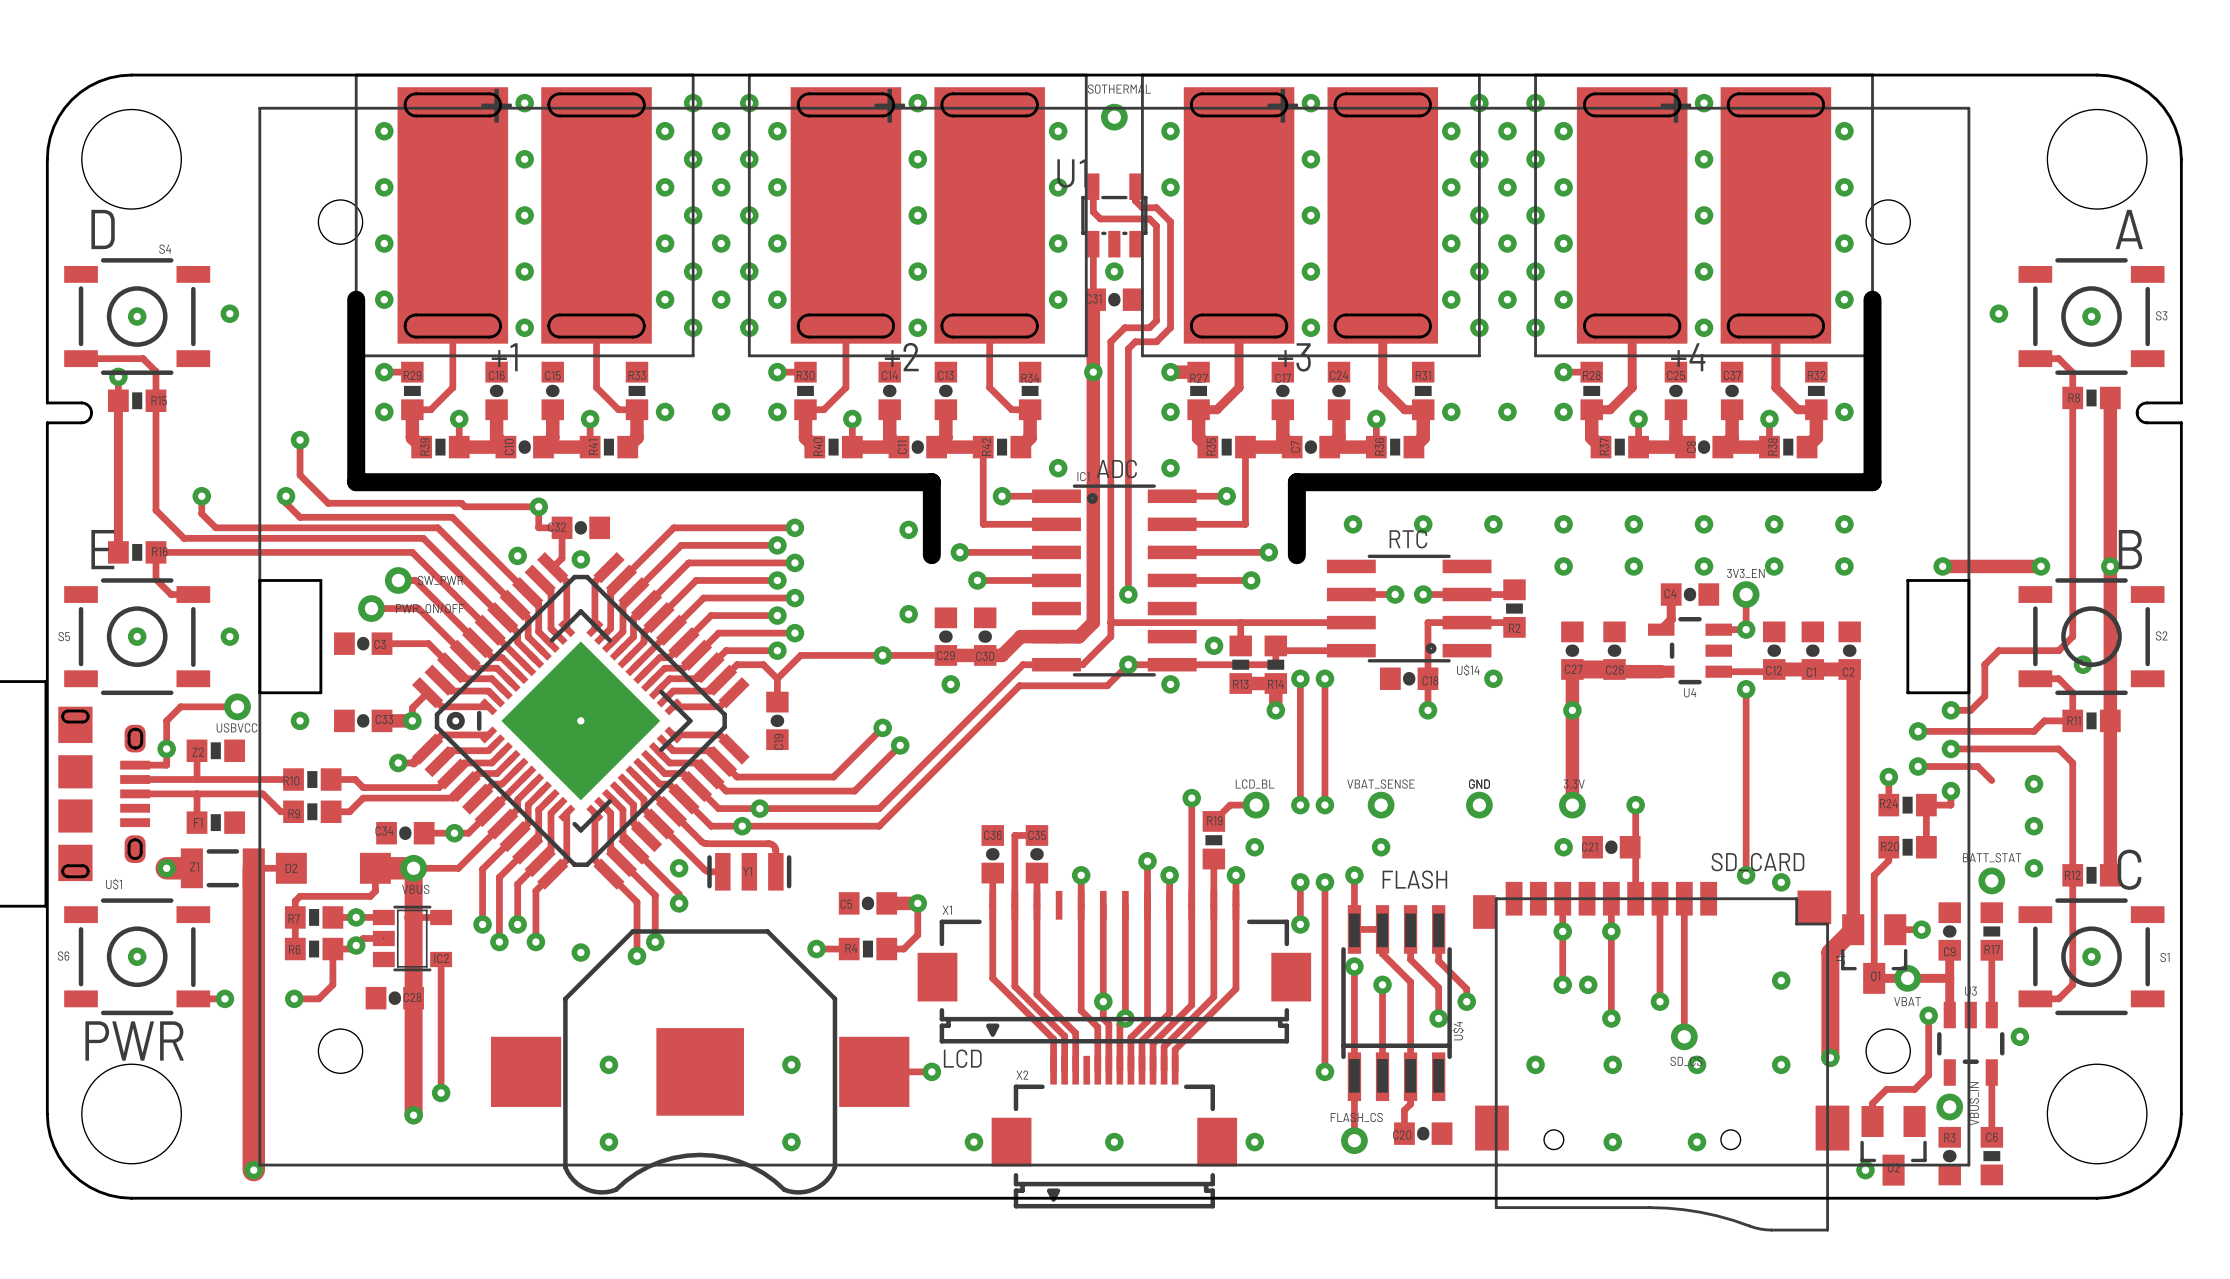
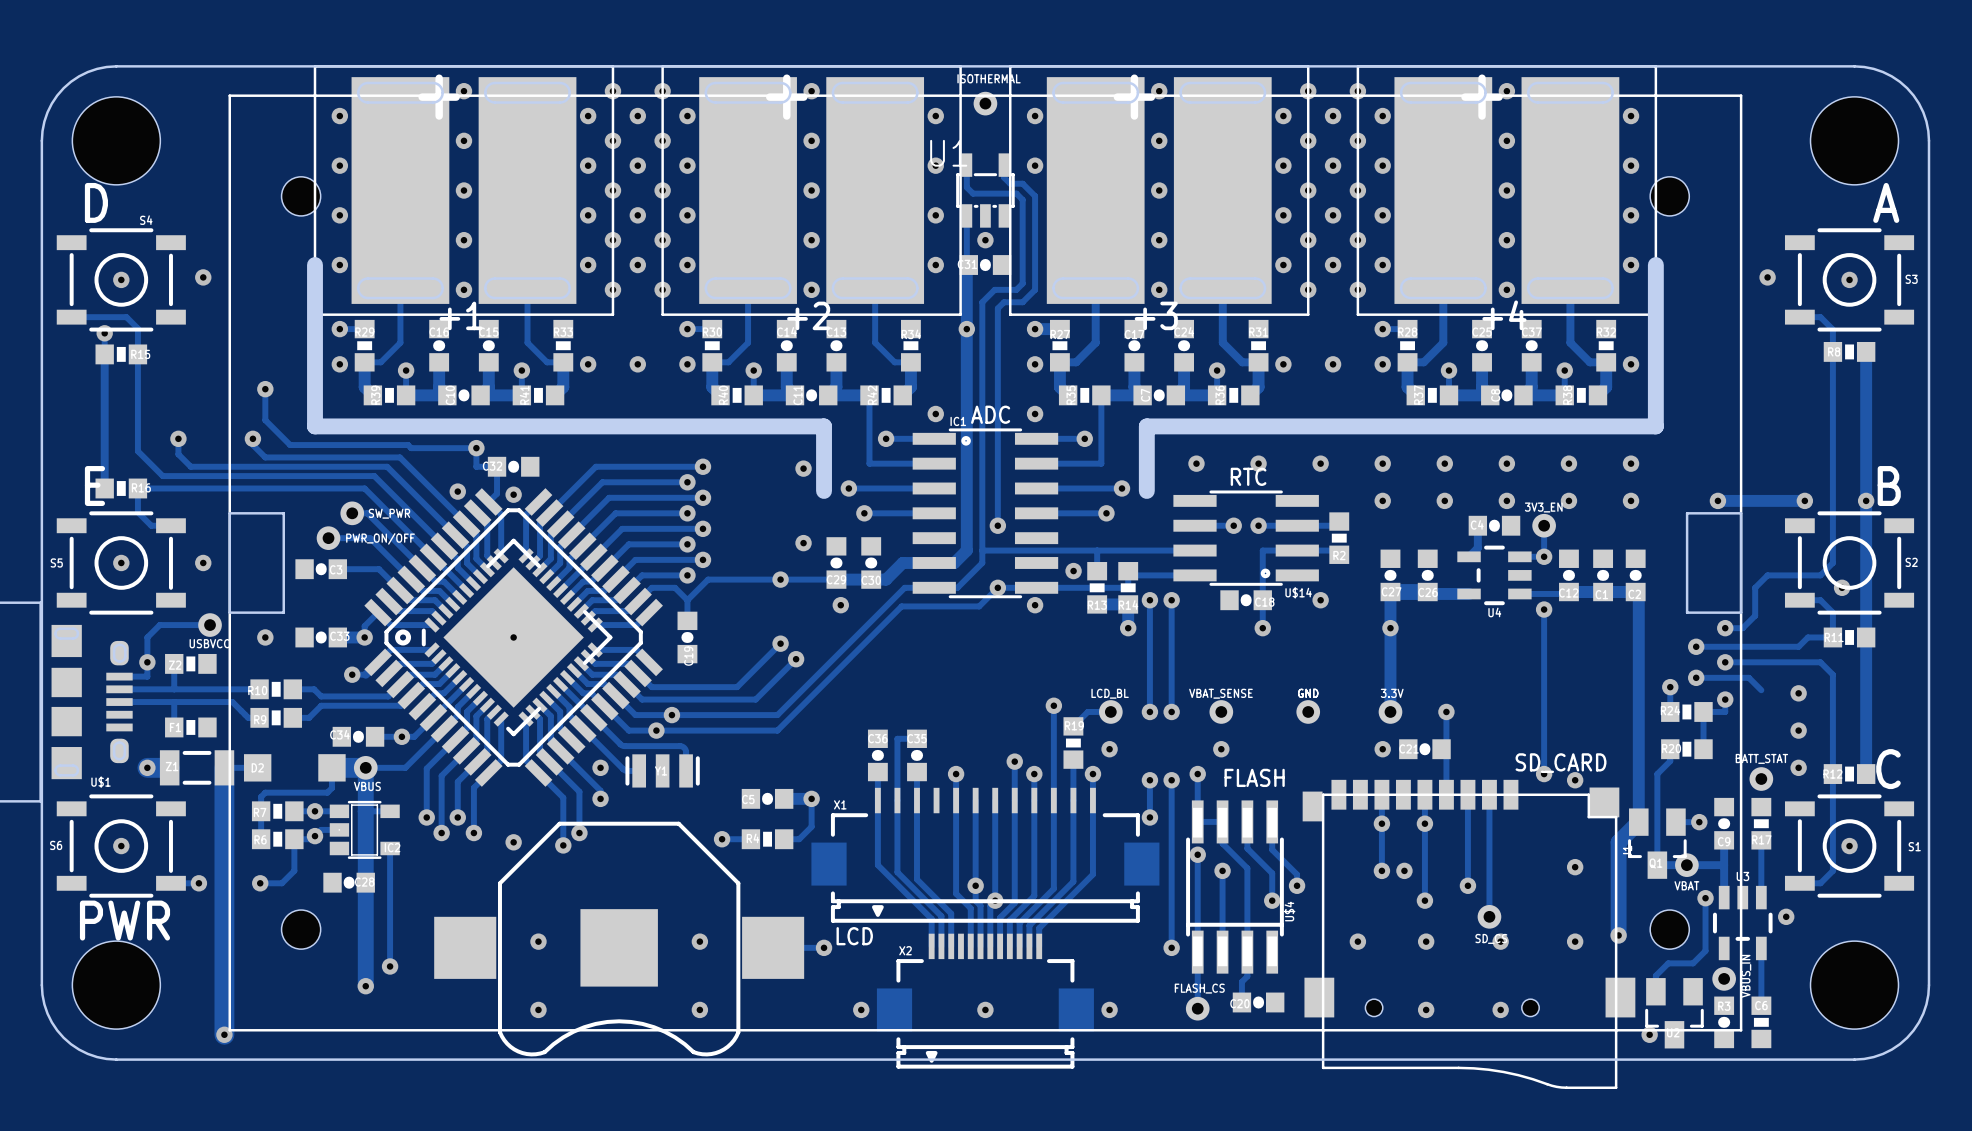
board edge: (47, 402) (84, 403) (89, 406) (91, 412) (89, 418) (84, 422) (47, 422) -> (41, 356) (41, 373)
board edge: (2181, 402) (2144, 403) (2139, 406) (2137, 412) (2139, 418) (2144, 422) (2181, 422) -> (1928, 356) (1928, 373)

